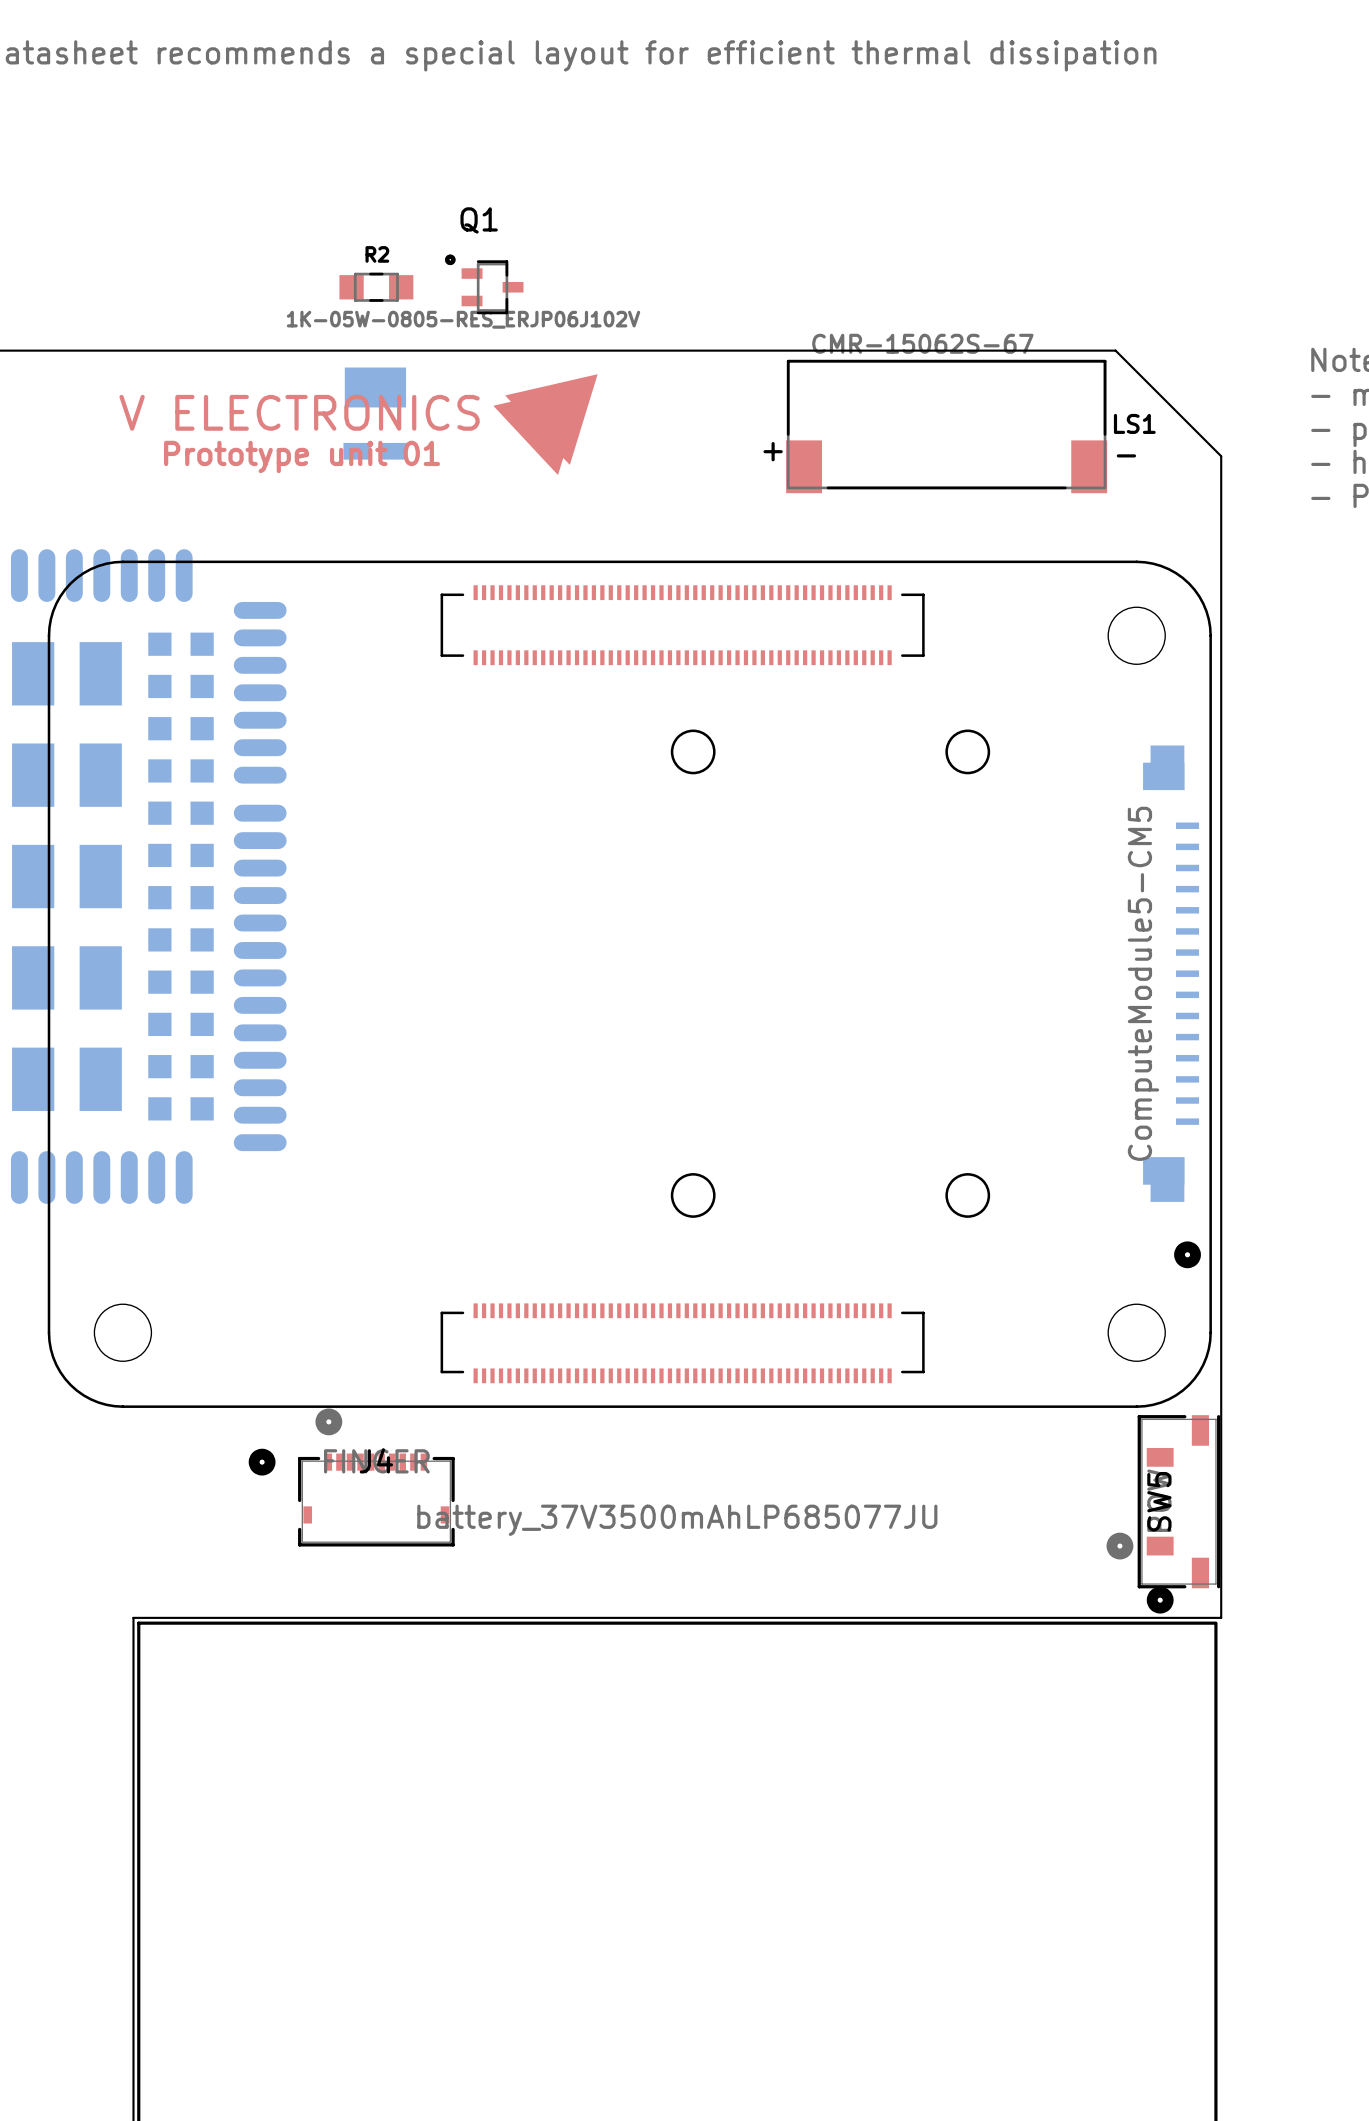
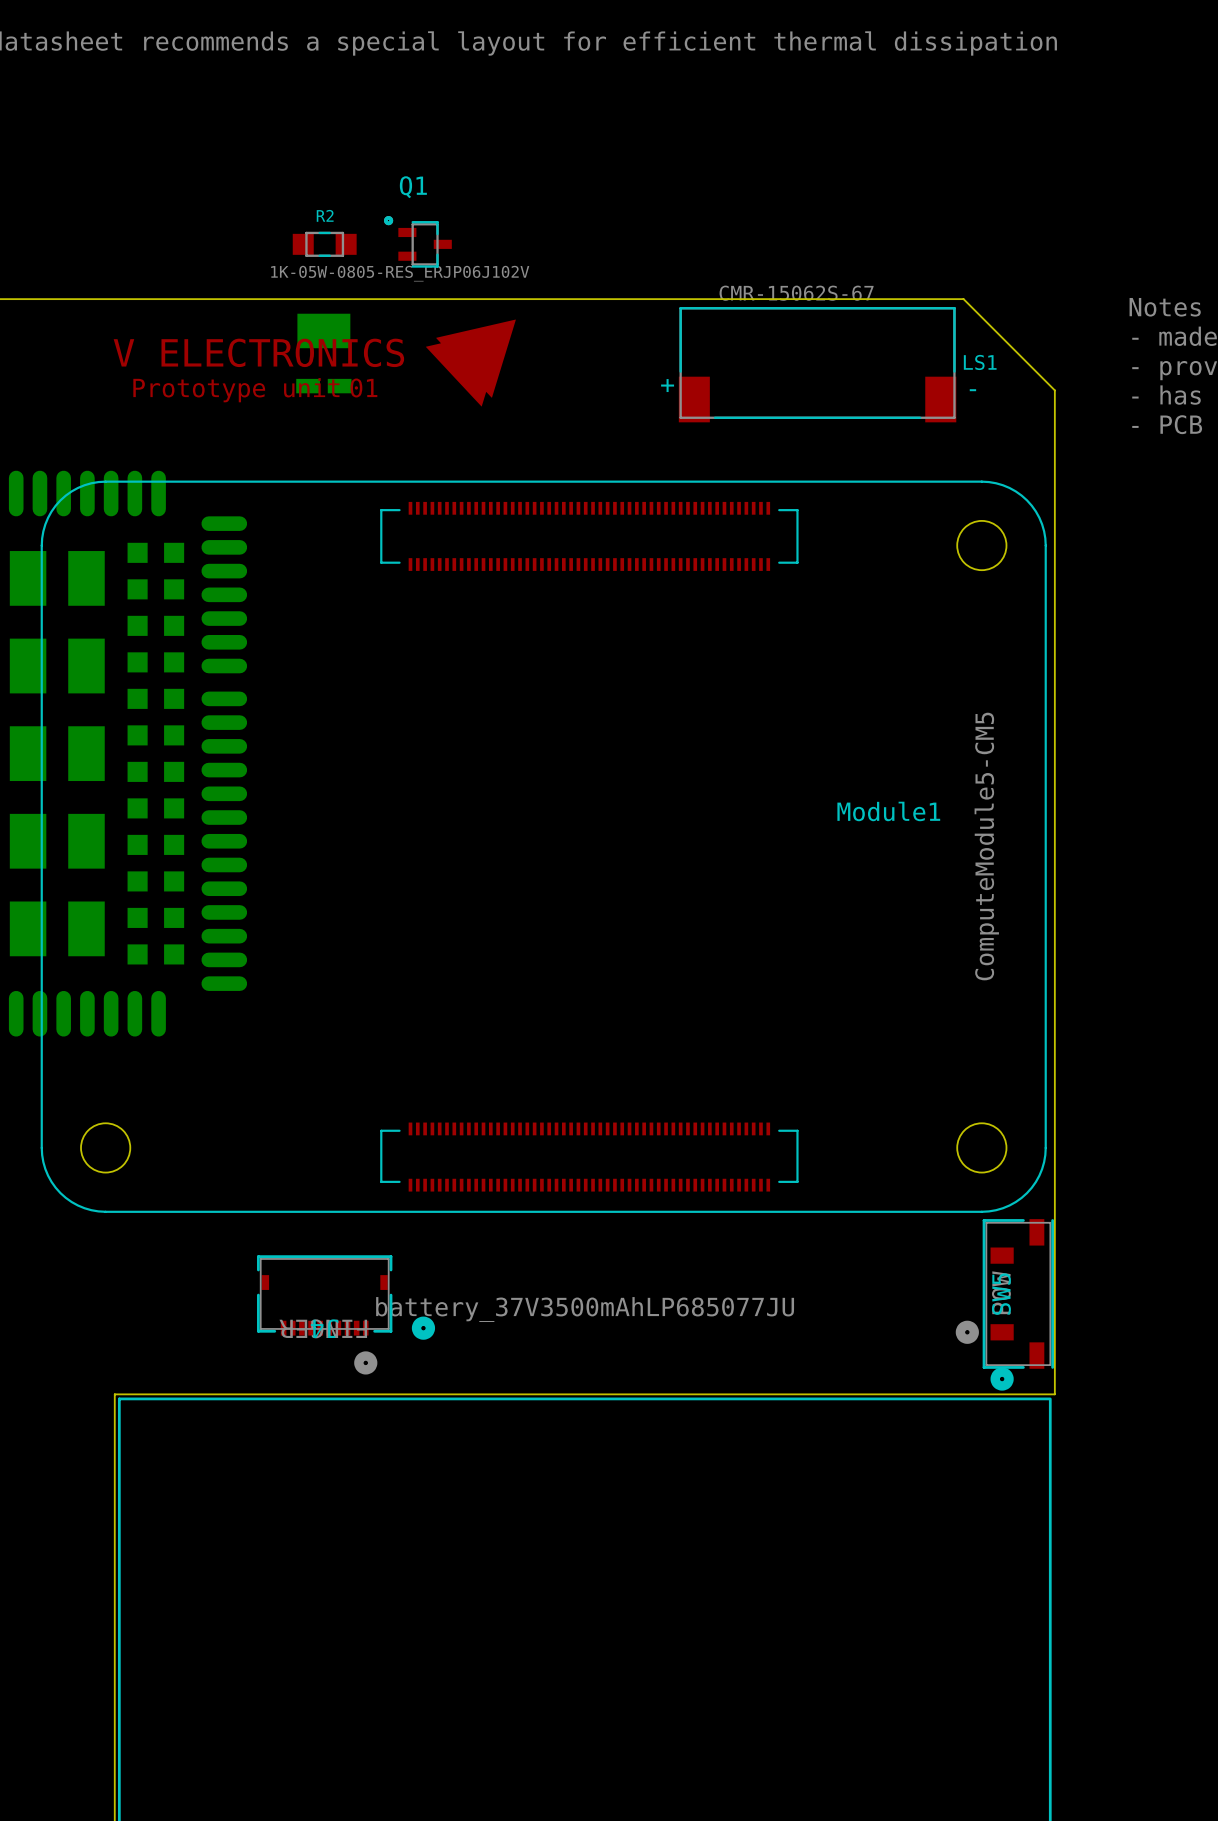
drawing: [670, 729, 991, 1218] -> none
Module1 name: none -> Module1 (888, 811)
part: (1171, 1006) -> none
J4 rotation: 0° (351, 1477) -> 180° (346, 1314)

